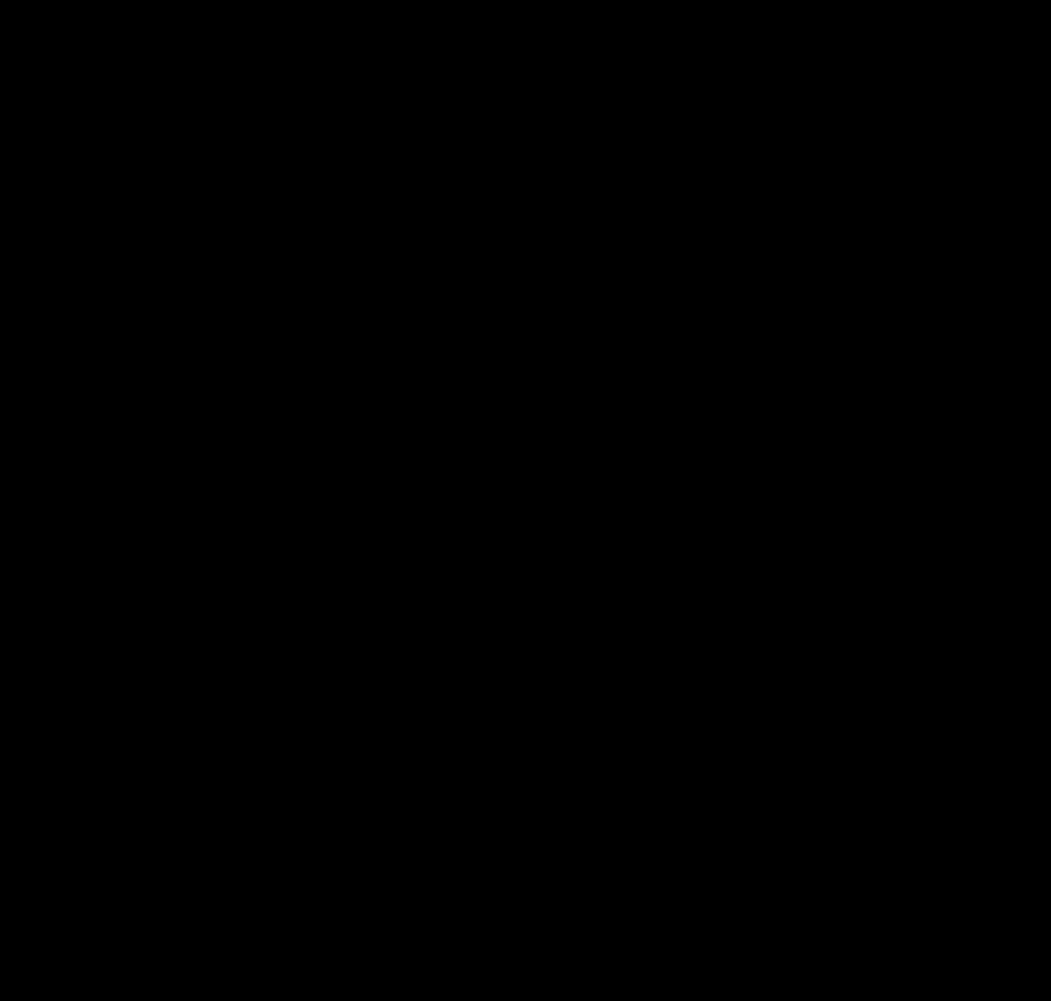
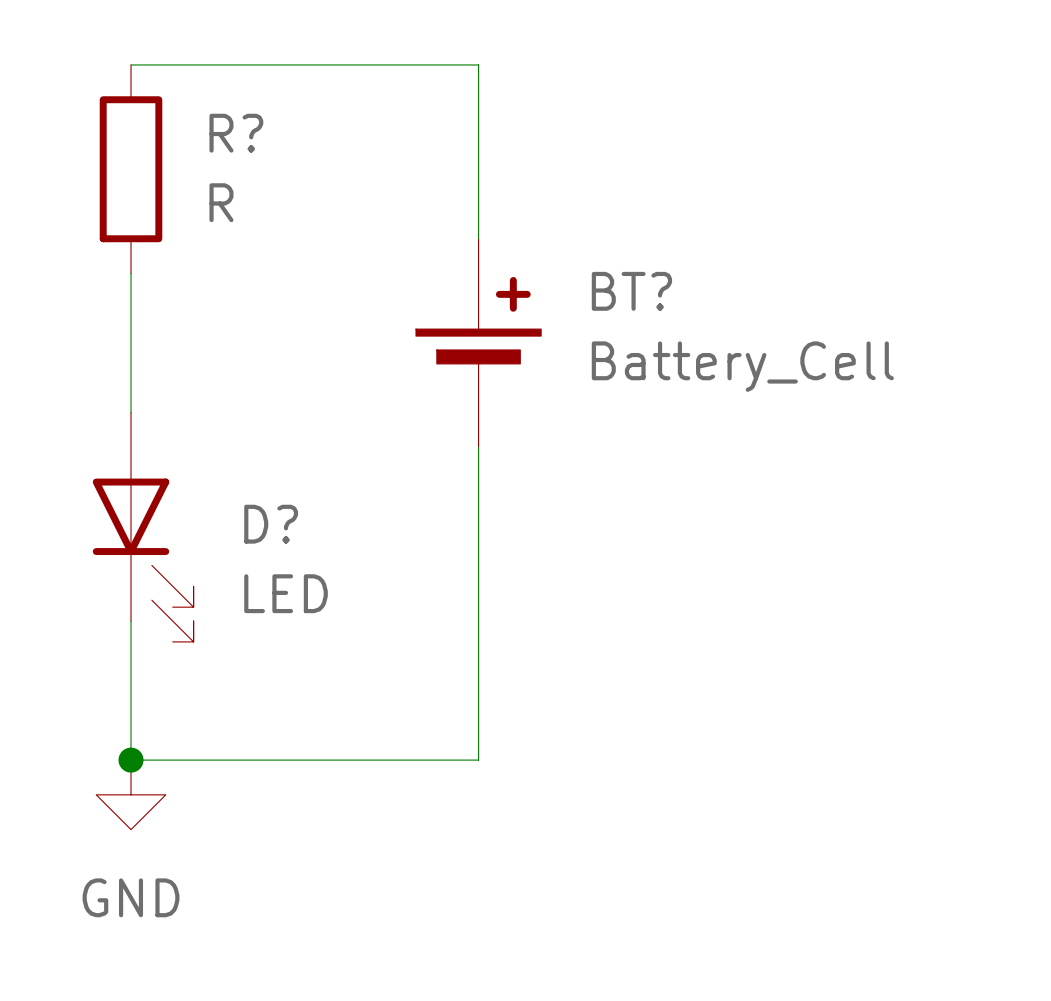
wire: none -> (131, 64) (478, 64) (478, 238)
R?: none -> R (131, 169)
wire: none -> (131, 273) (131, 412)
BT?: none -> Battery_Cell (478, 343)
wire: none -> (478, 447) (478, 760) (131, 760) (131, 621)
D?: none -> LED (143, 527)
junction: none -> (131, 760)
power symbol: none -> GND (131, 794)

